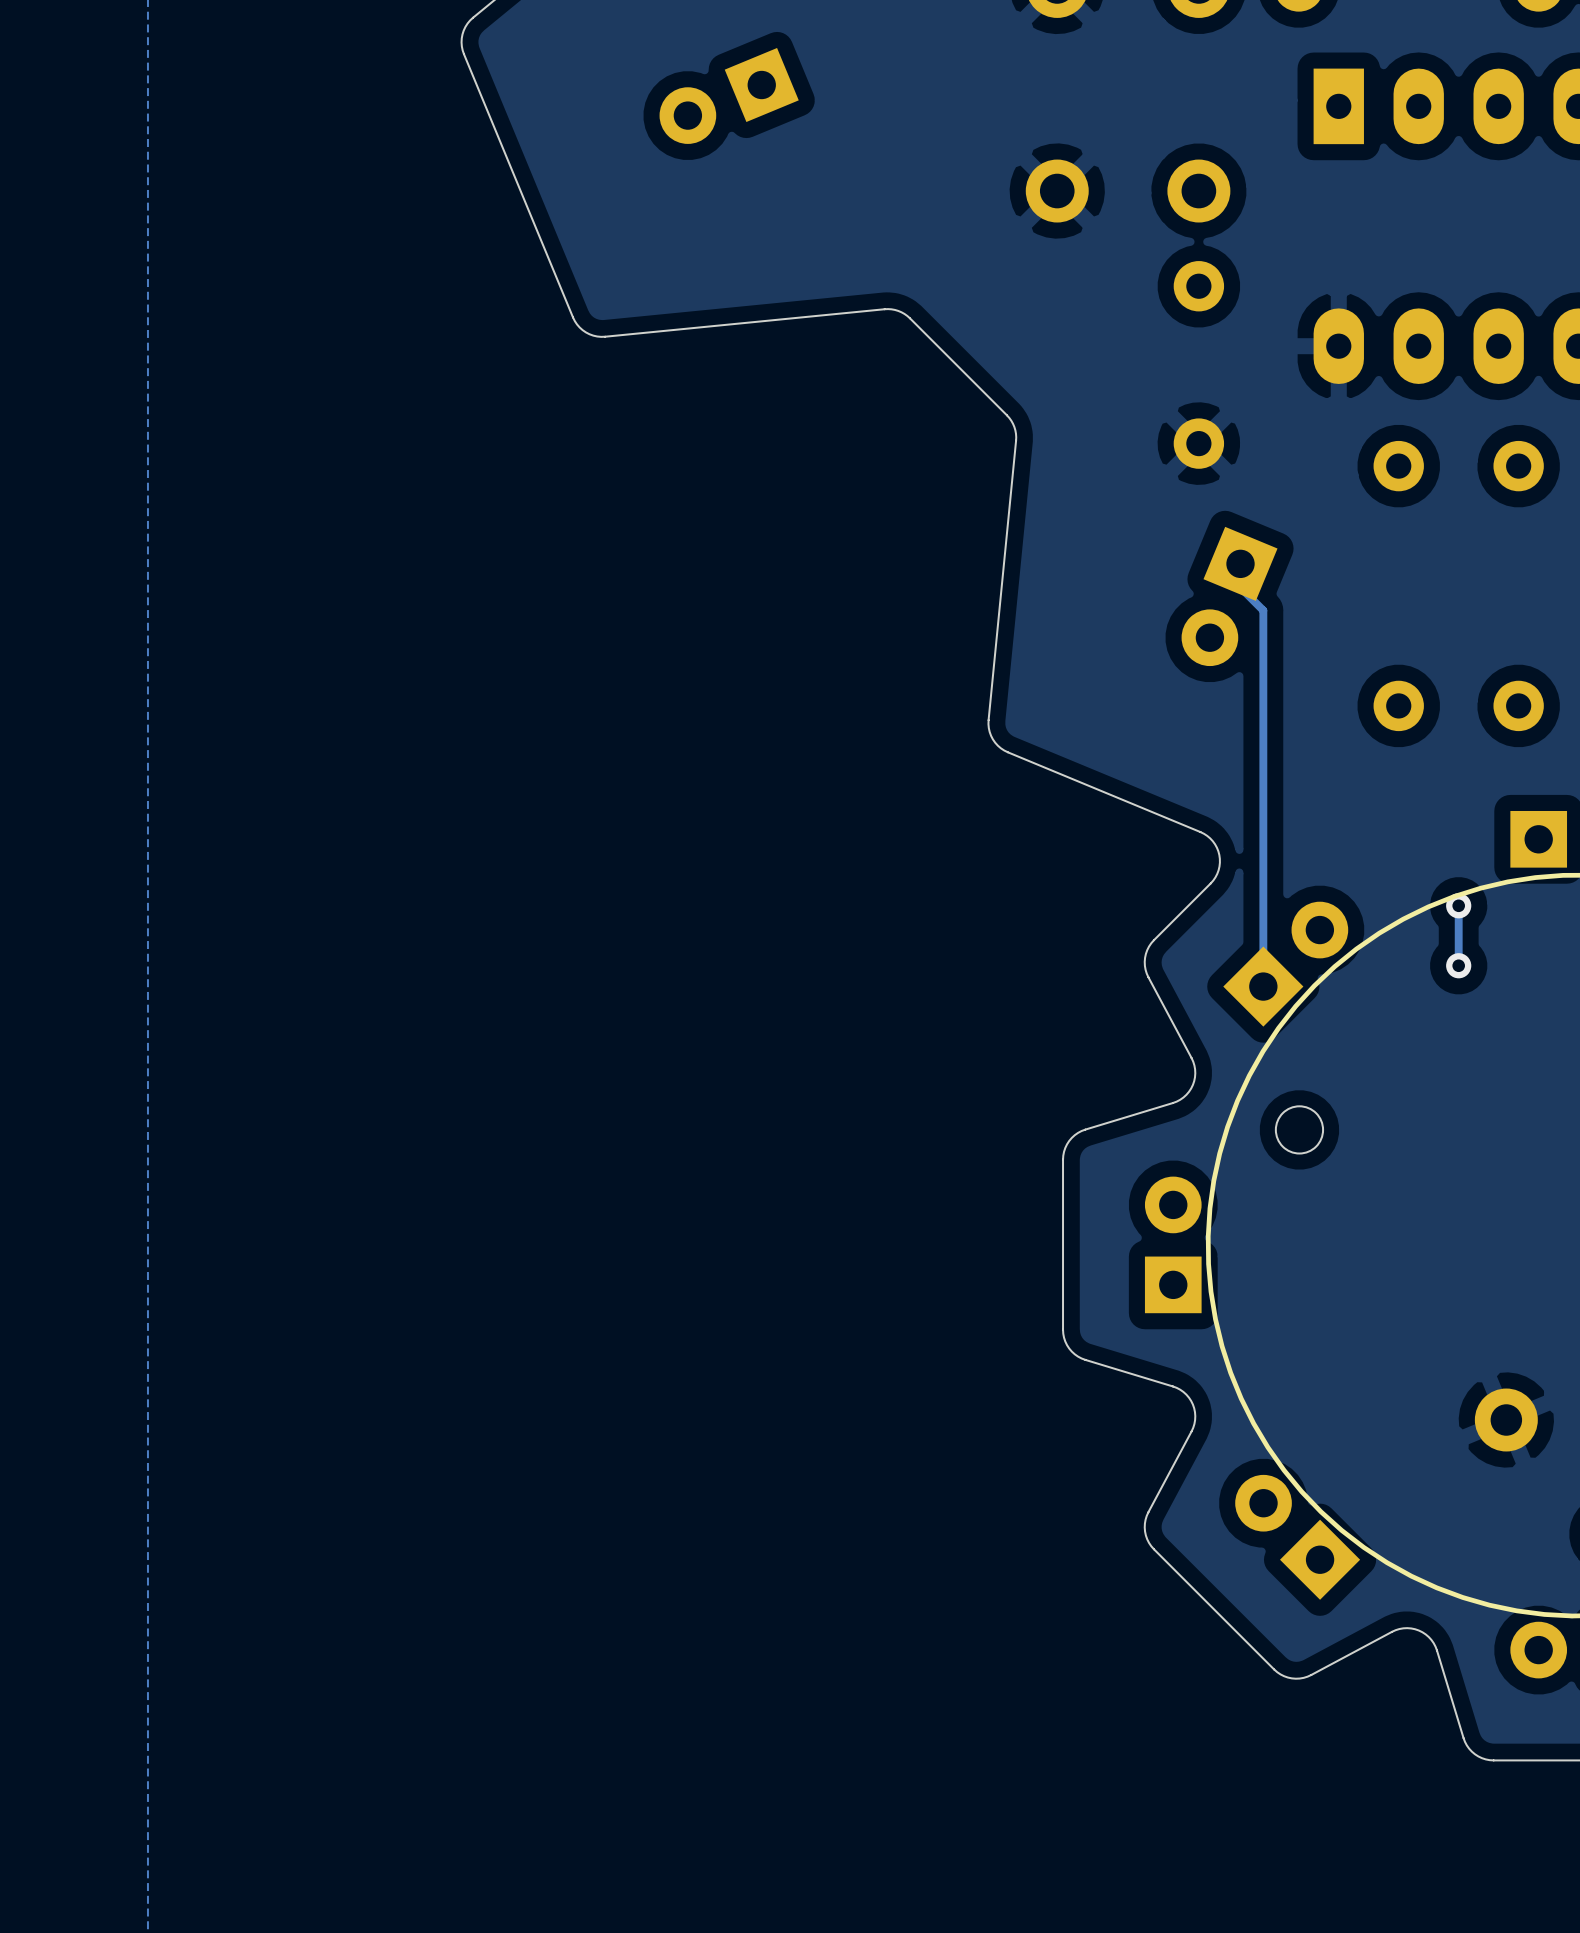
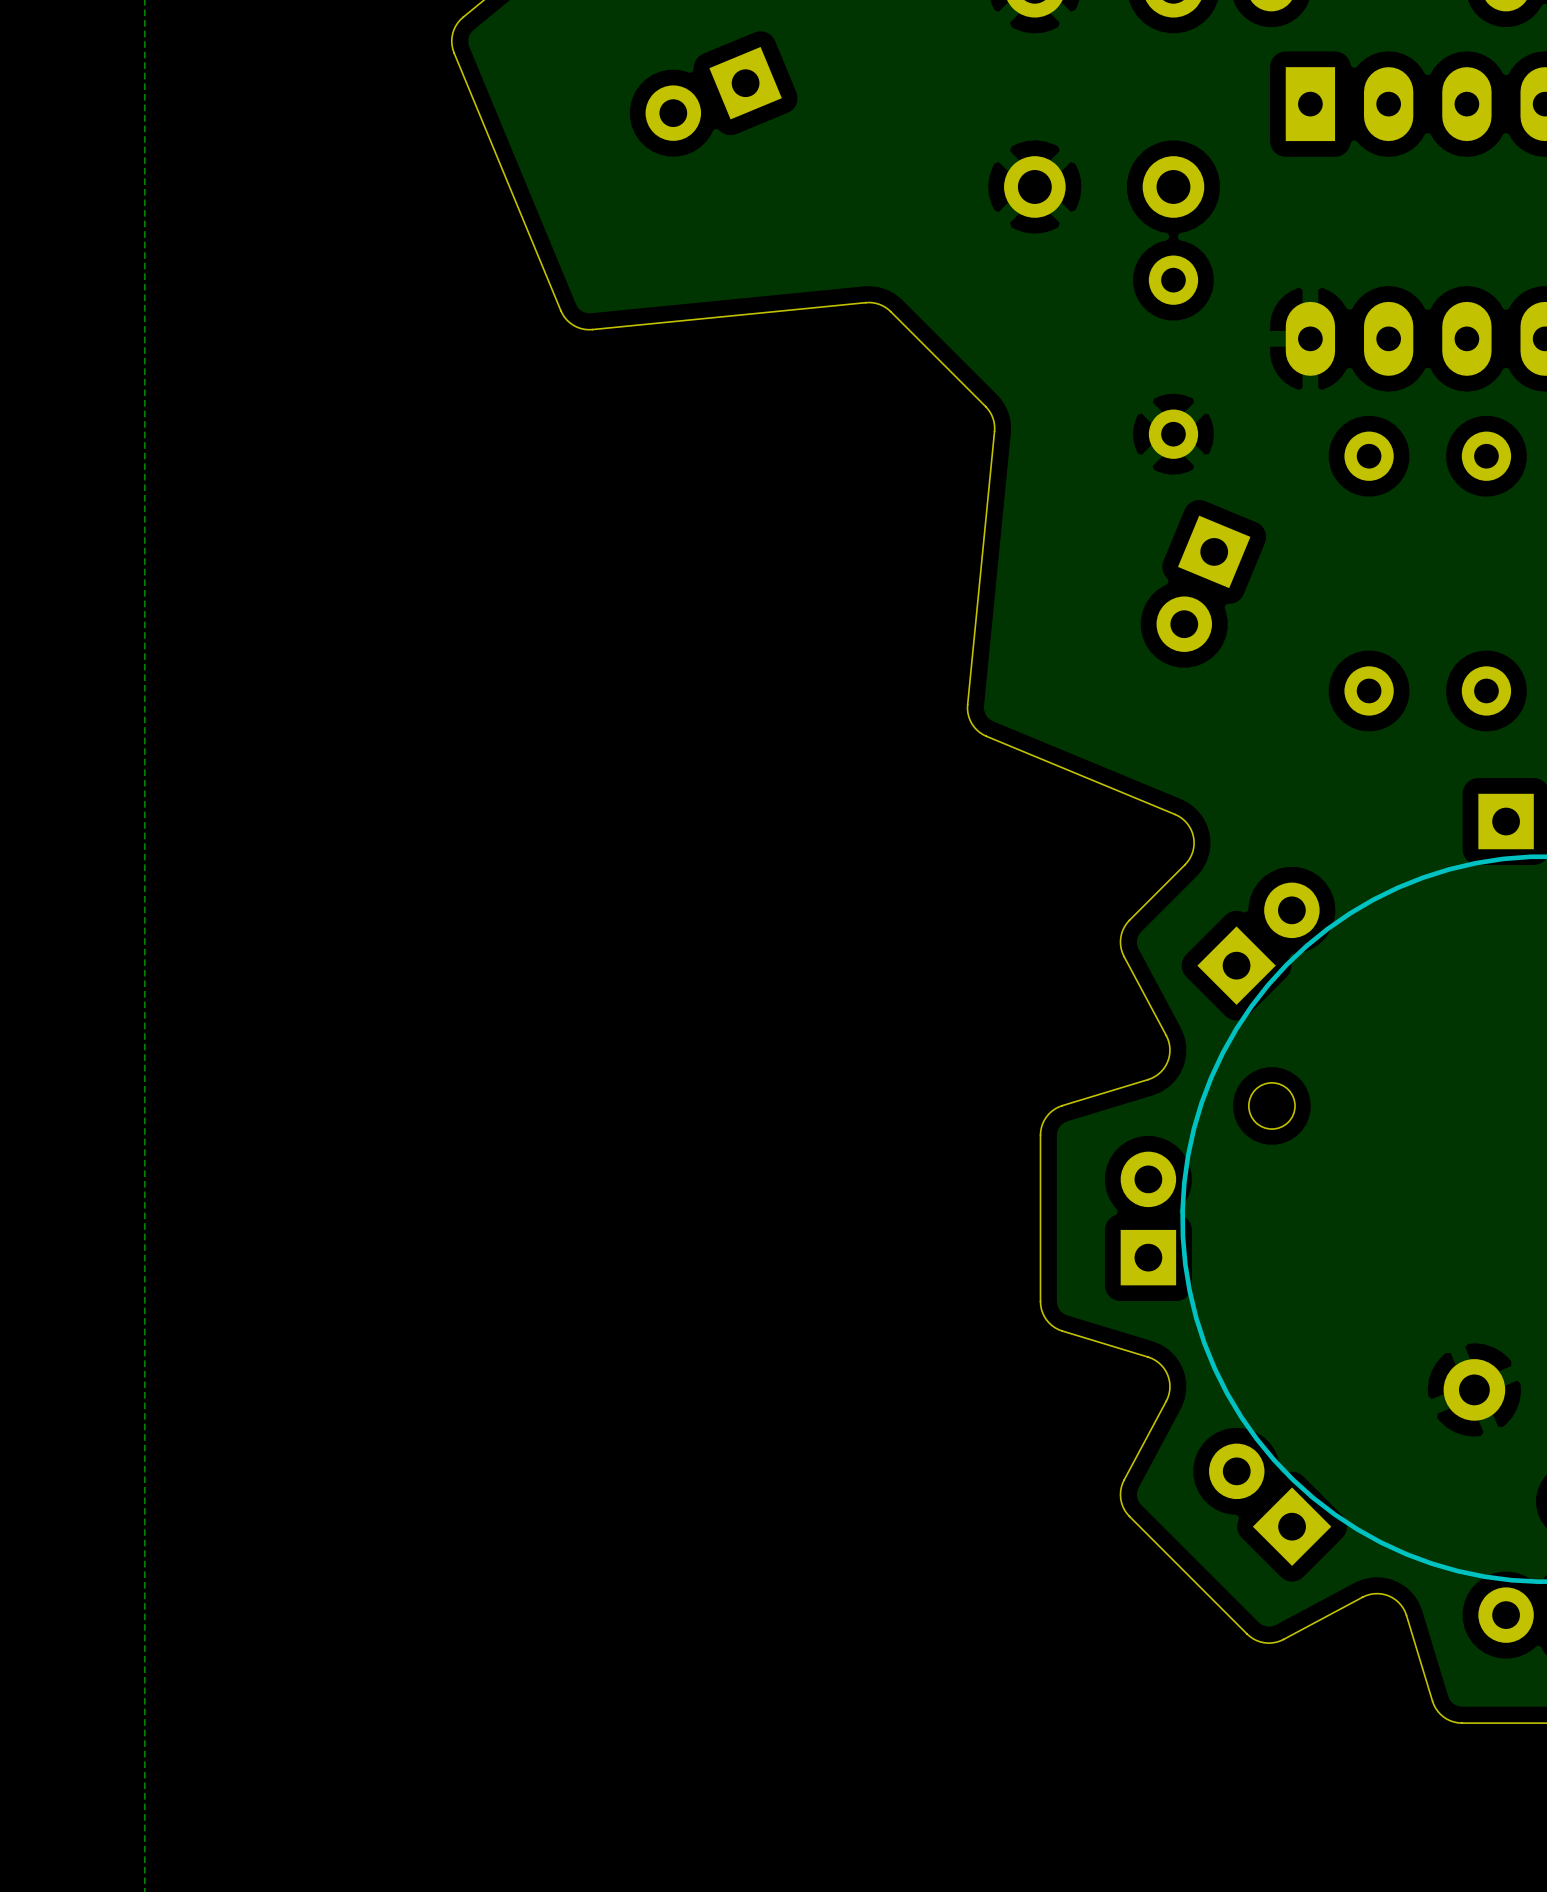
track: (1240, 563) (1240, 587) (1263, 610) (1263, 986) -> none
track: (1458, 905) (1458, 965) -> none
via: (1458, 905) -> none
via: (1458, 965) -> none

